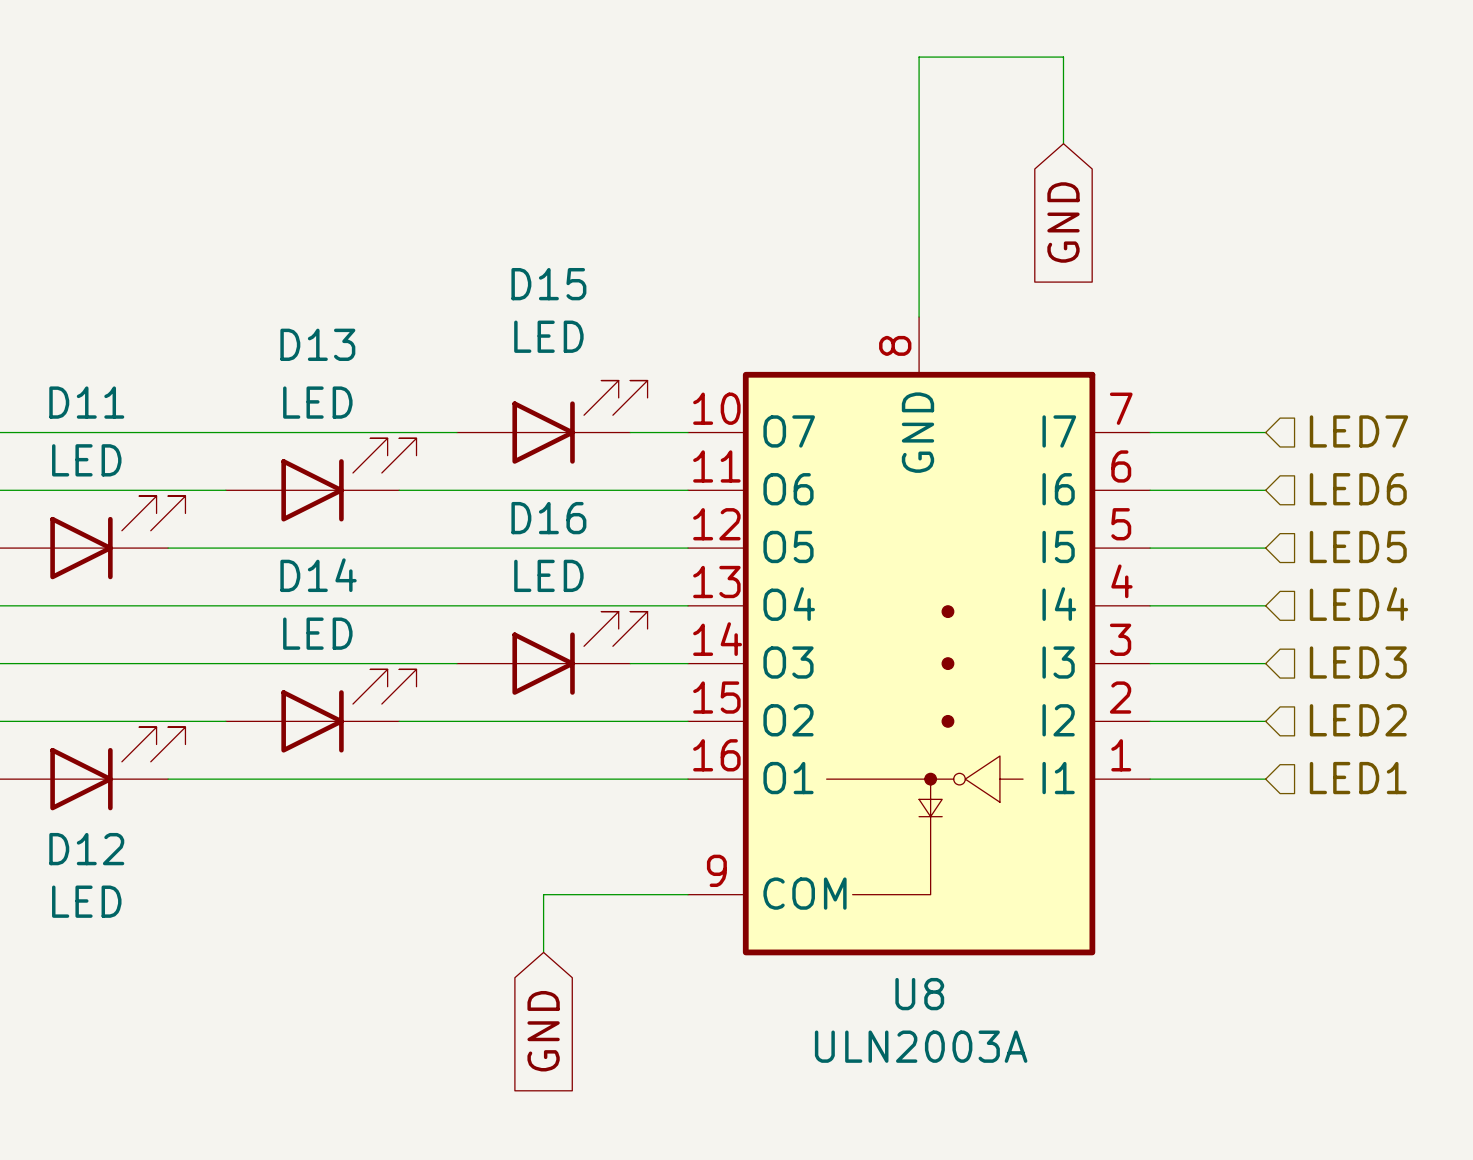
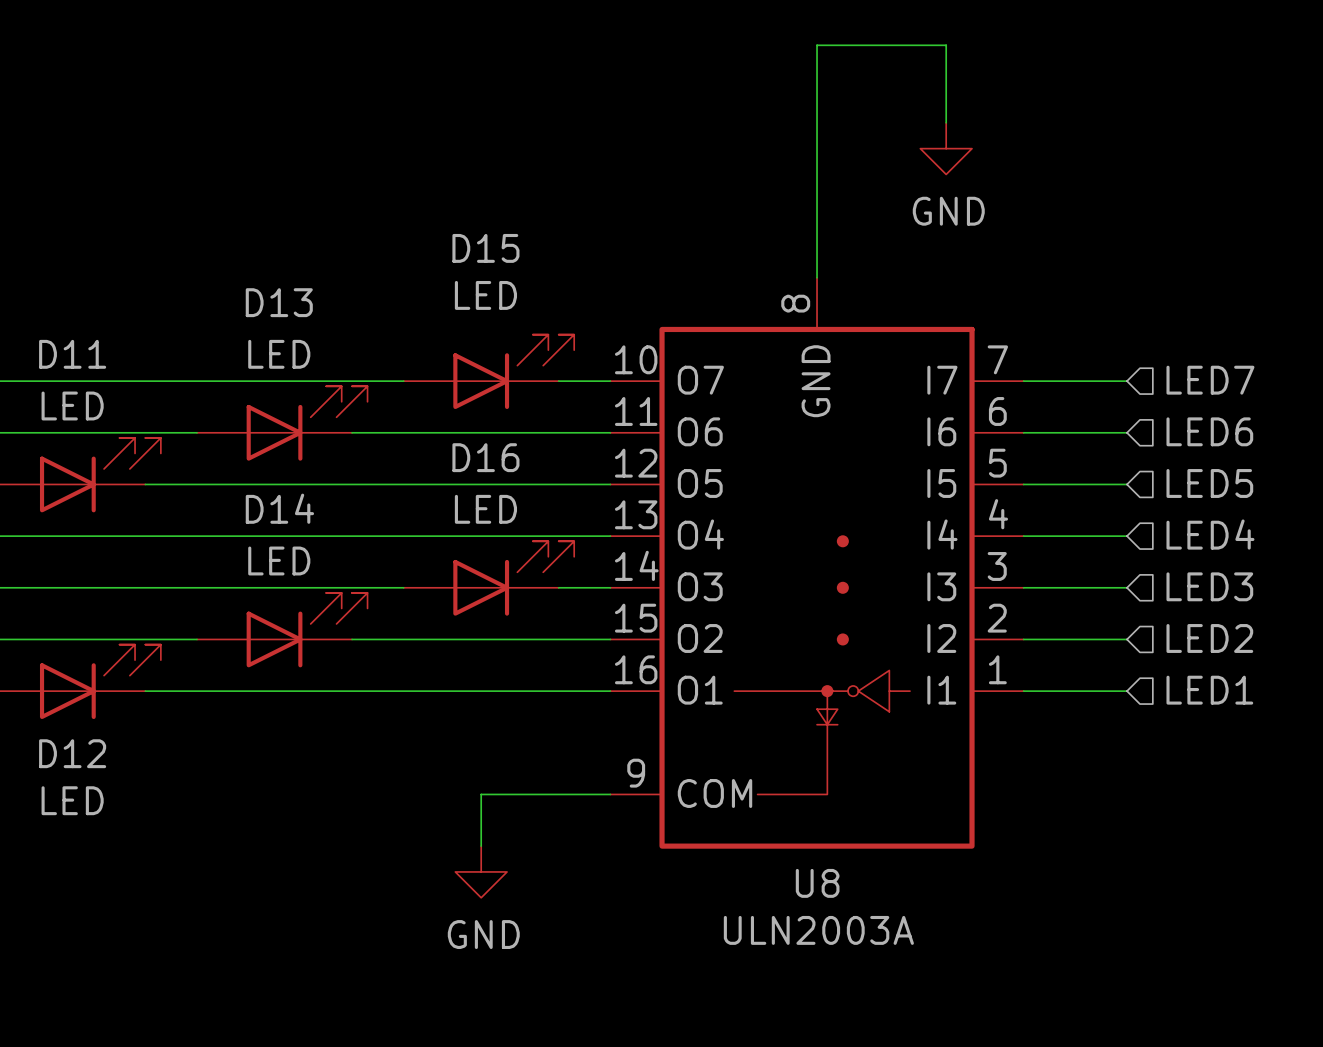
power symbol: none -> GND (946, 148)
global label: GND (1063, 222) -> none
power symbol: none -> GND (481, 871)
global label: GND (543, 1031) -> none

